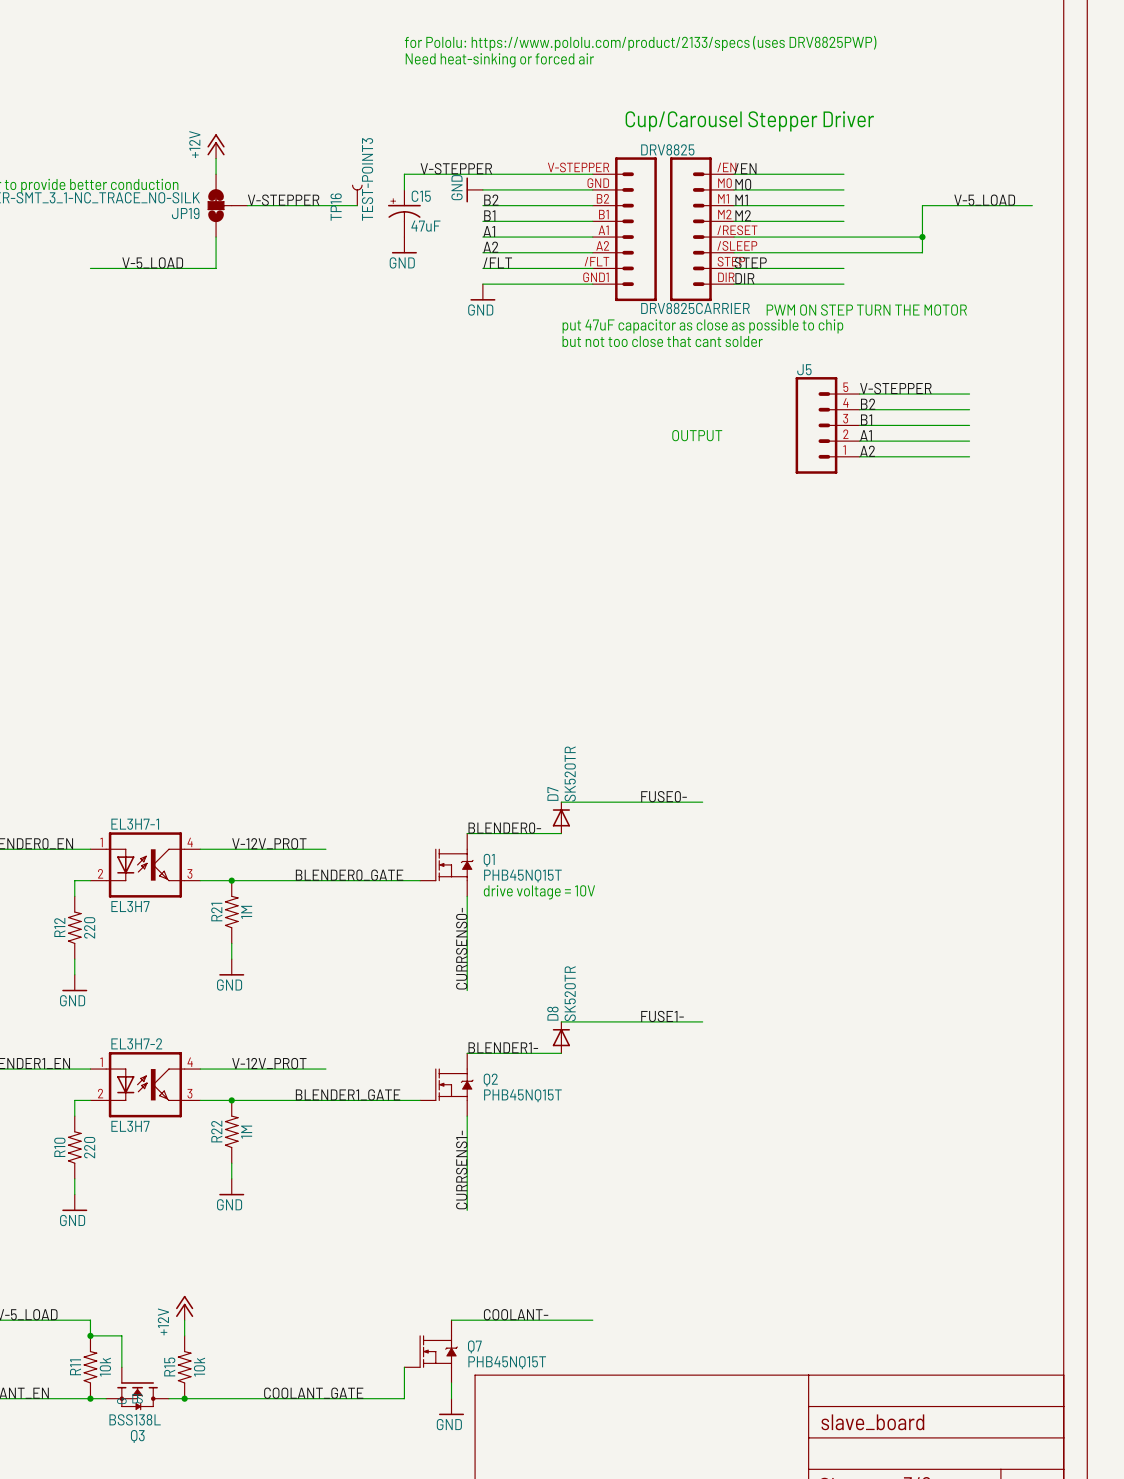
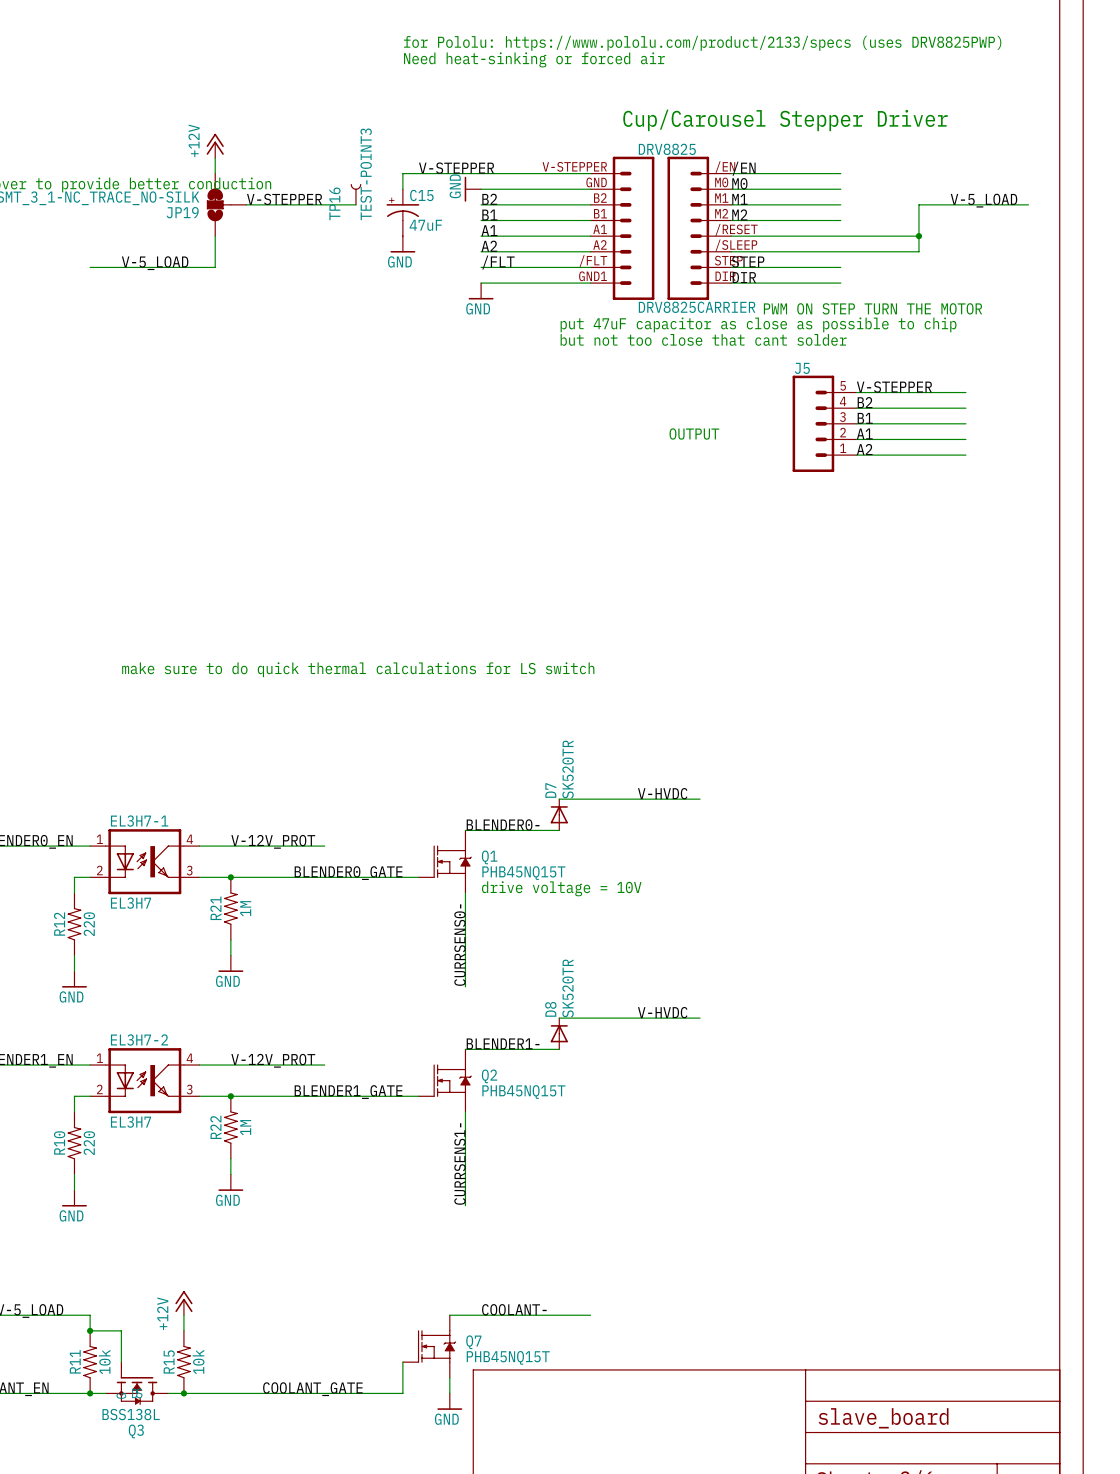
text: none -> make sure to do quick thermal calculations for LS switch (358, 669)
label: FUSE0- (664, 796) -> V-HVDC (662, 793)
label: FUSE1- (662, 1016) -> V-HVDC (662, 1012)

